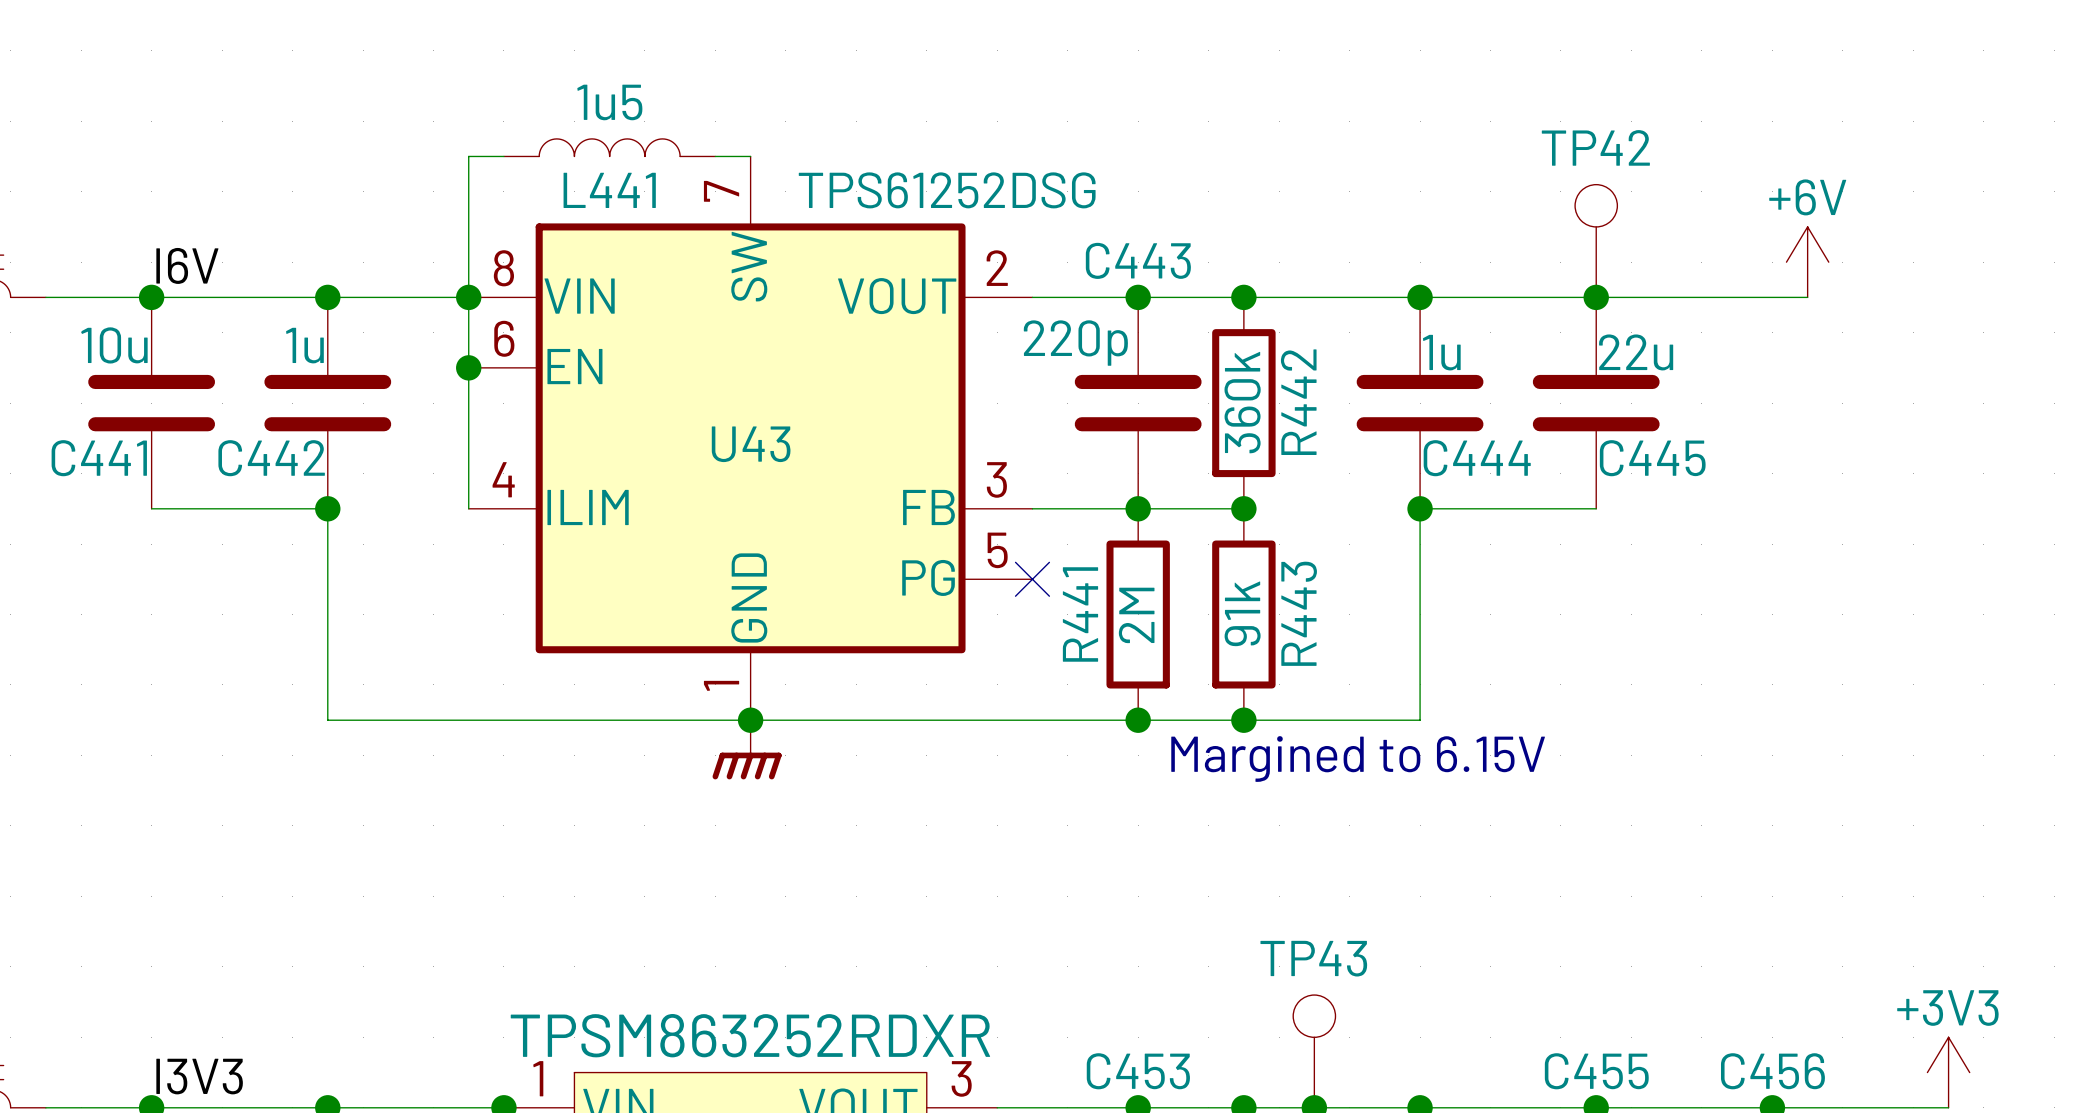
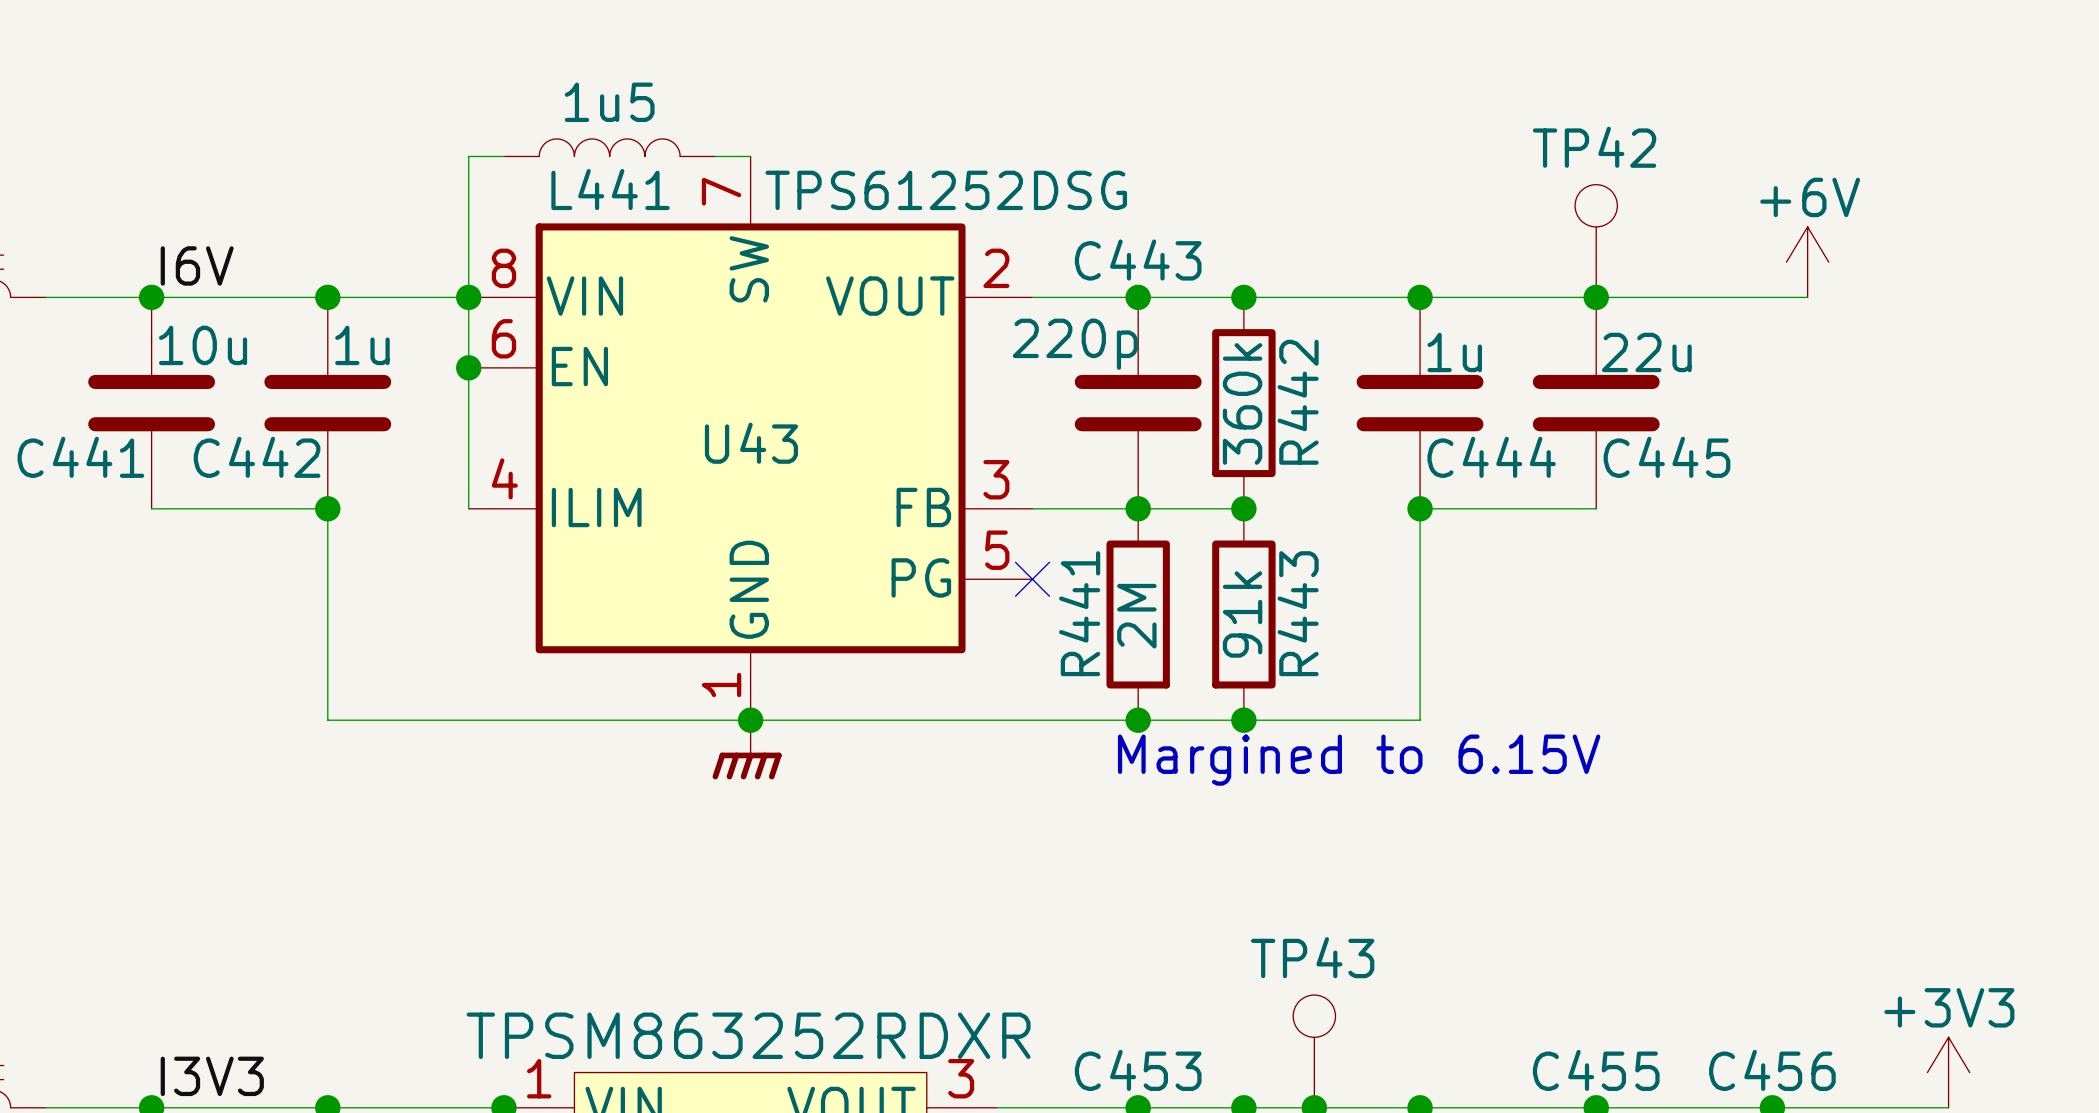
C443 value position: 220p (1075, 343) -> 220p (1075, 344)
C441 value position: 10u (114, 345) -> 10u (203, 345)
C442 value position: 1u (304, 345) -> 1u (362, 345)

